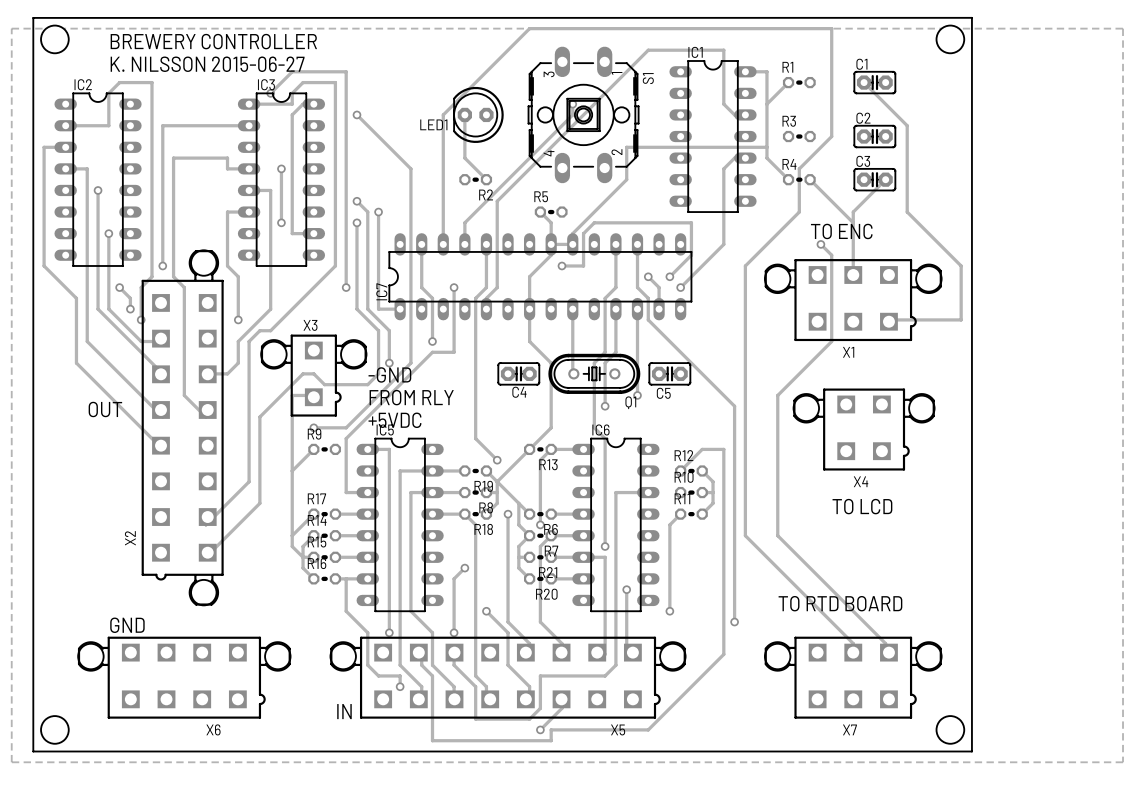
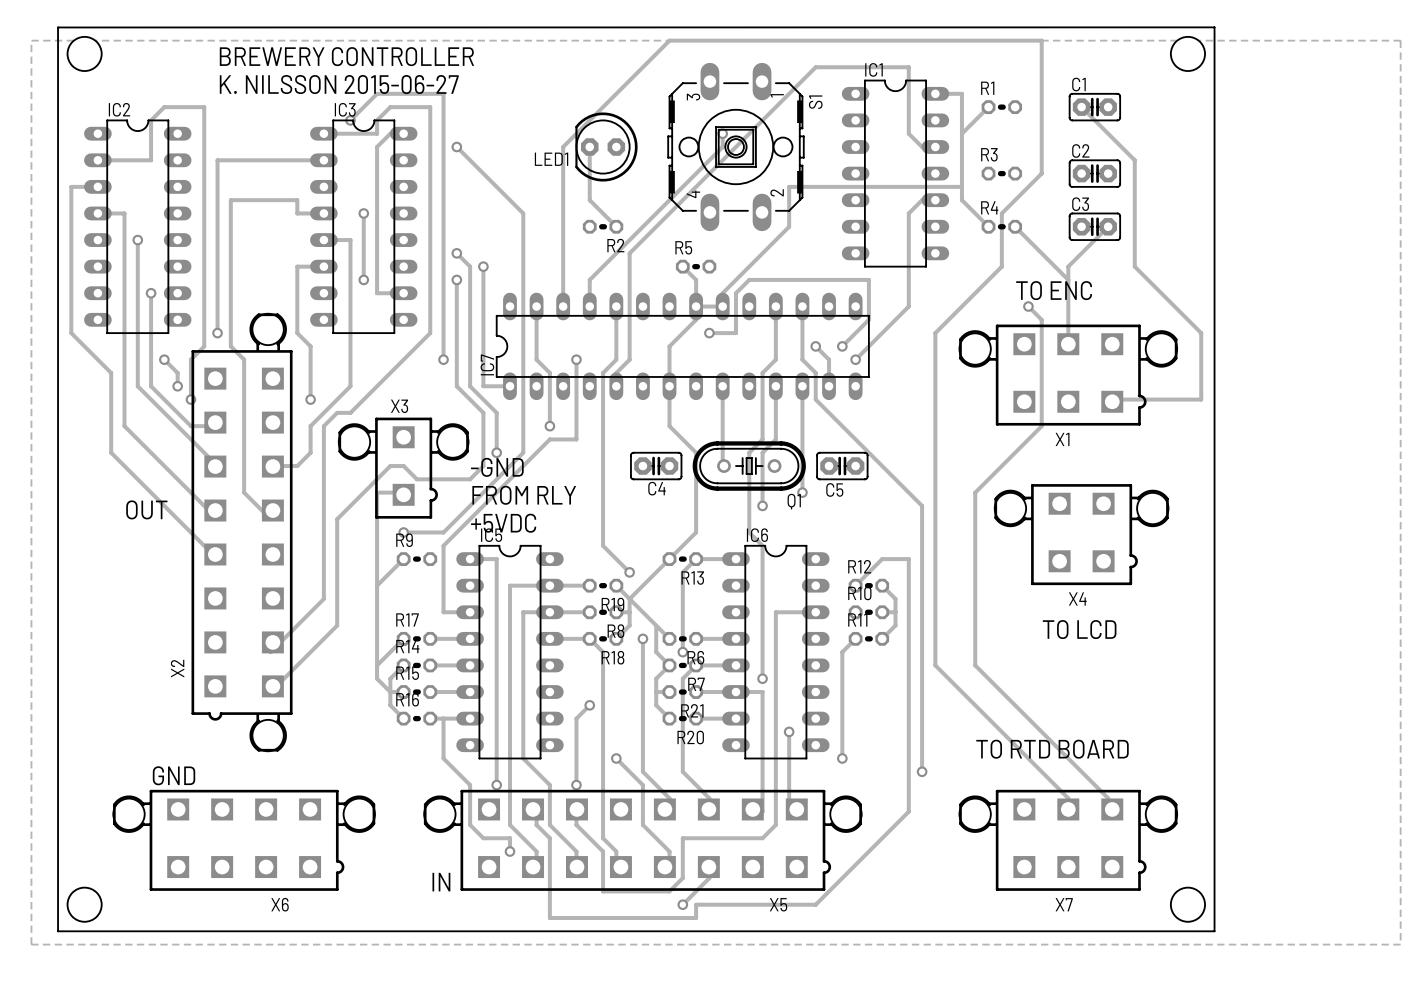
text position: BREWERY CONTROLLER (213, 41) -> BREWERY CONTROLLER (346, 56)
text position: K. NILSSON 2015-06-27 (207, 64) -> K. NILSSON 2015-06-27 (339, 84)

